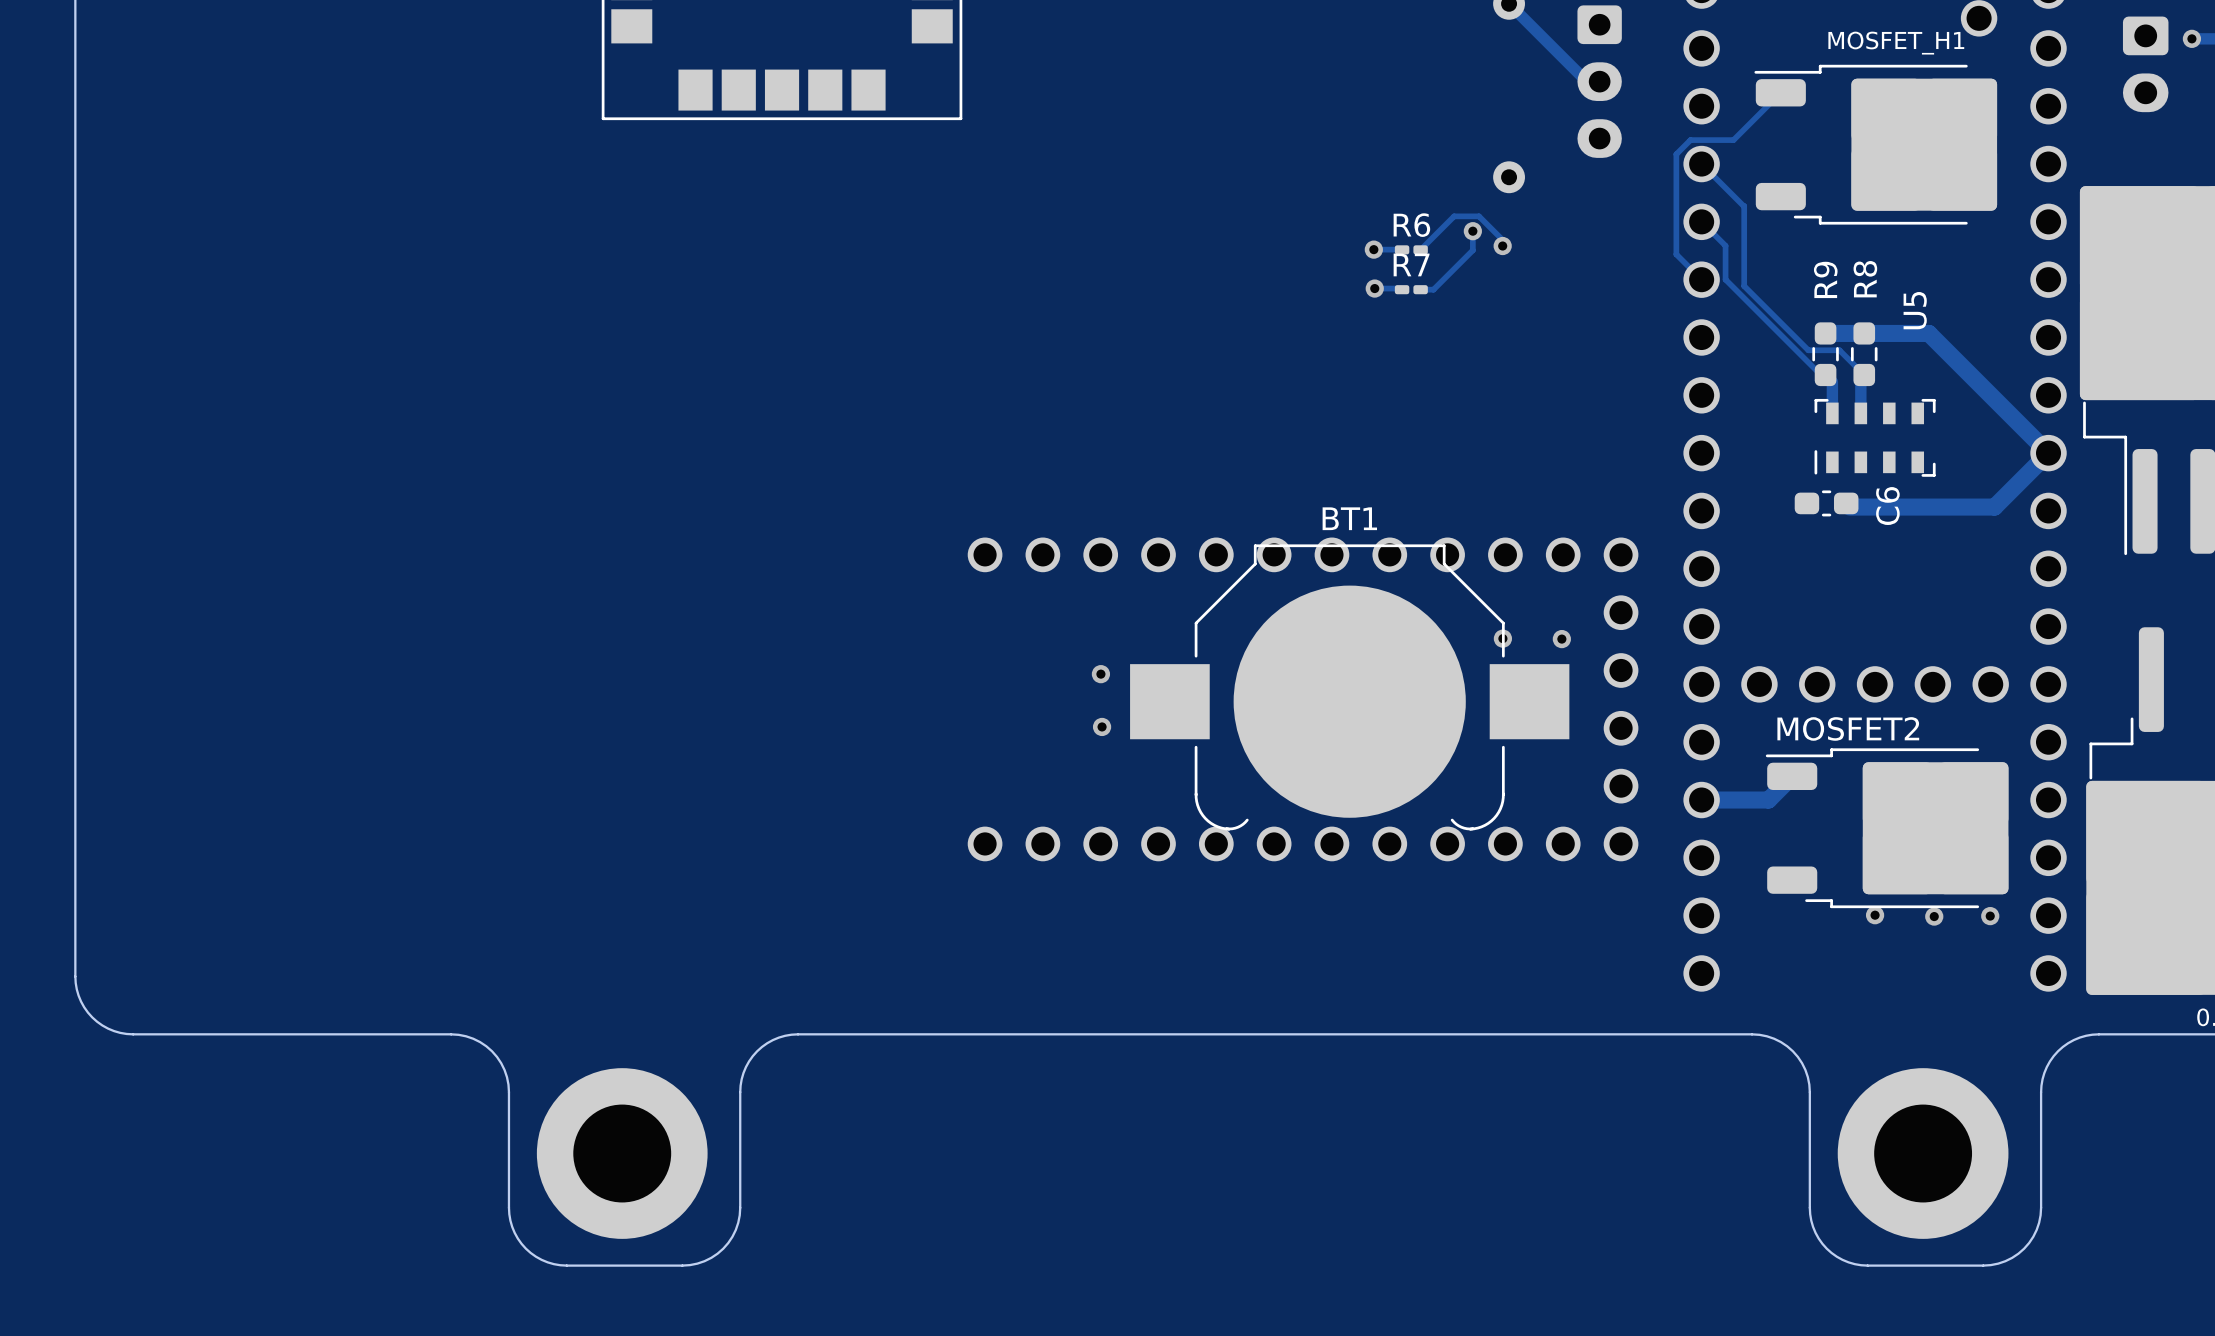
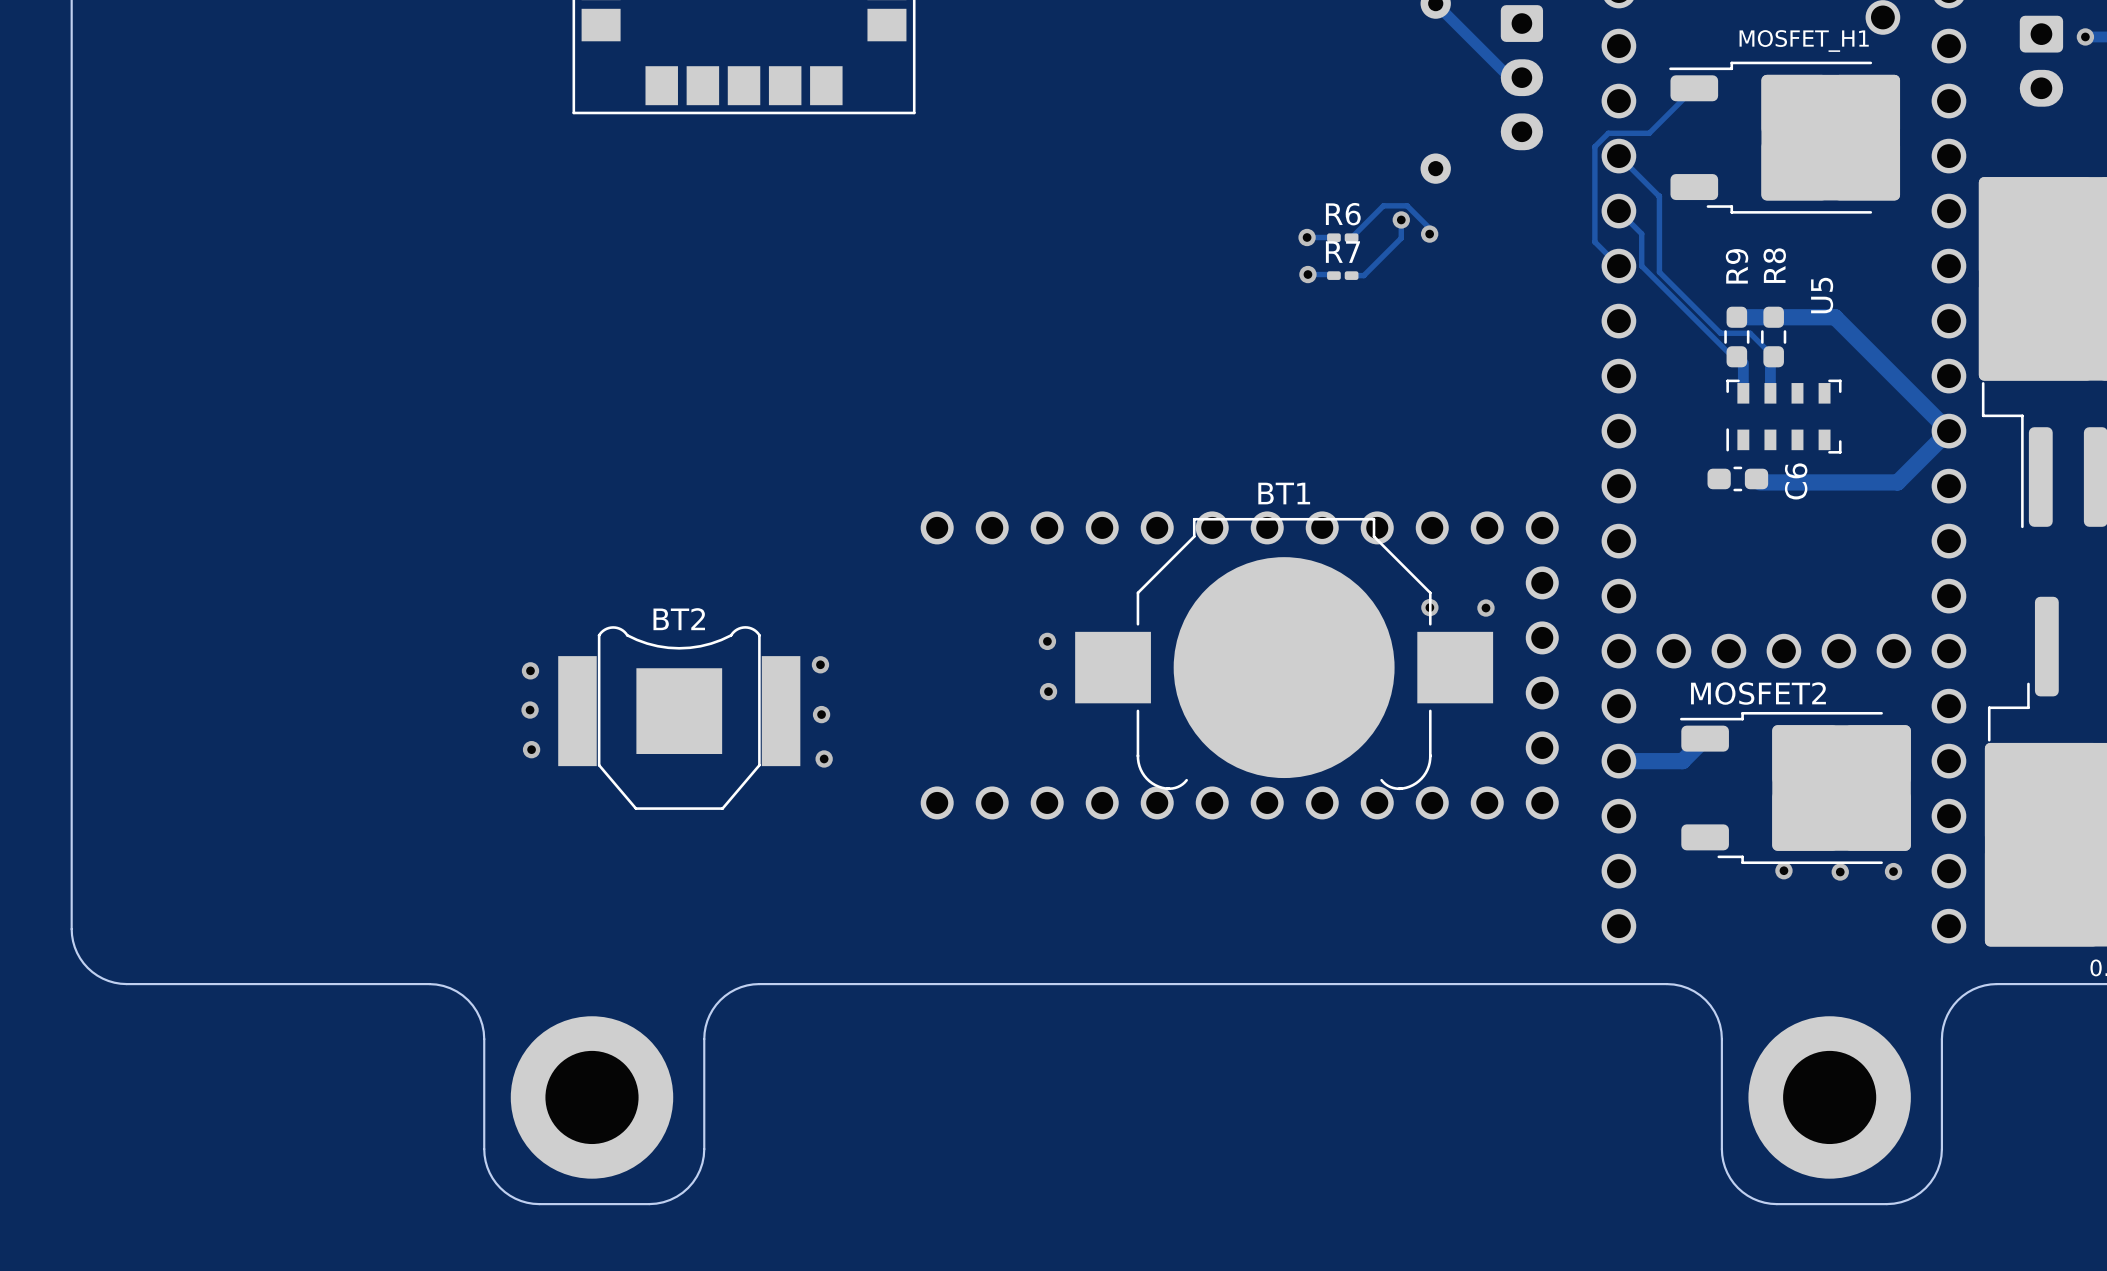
via: none -> (820, 664)
via: none -> (530, 670)
via: none -> (530, 710)
via: none -> (821, 714)
BT2: none -> (679, 717)
via: none -> (531, 749)
via: none -> (824, 758)

